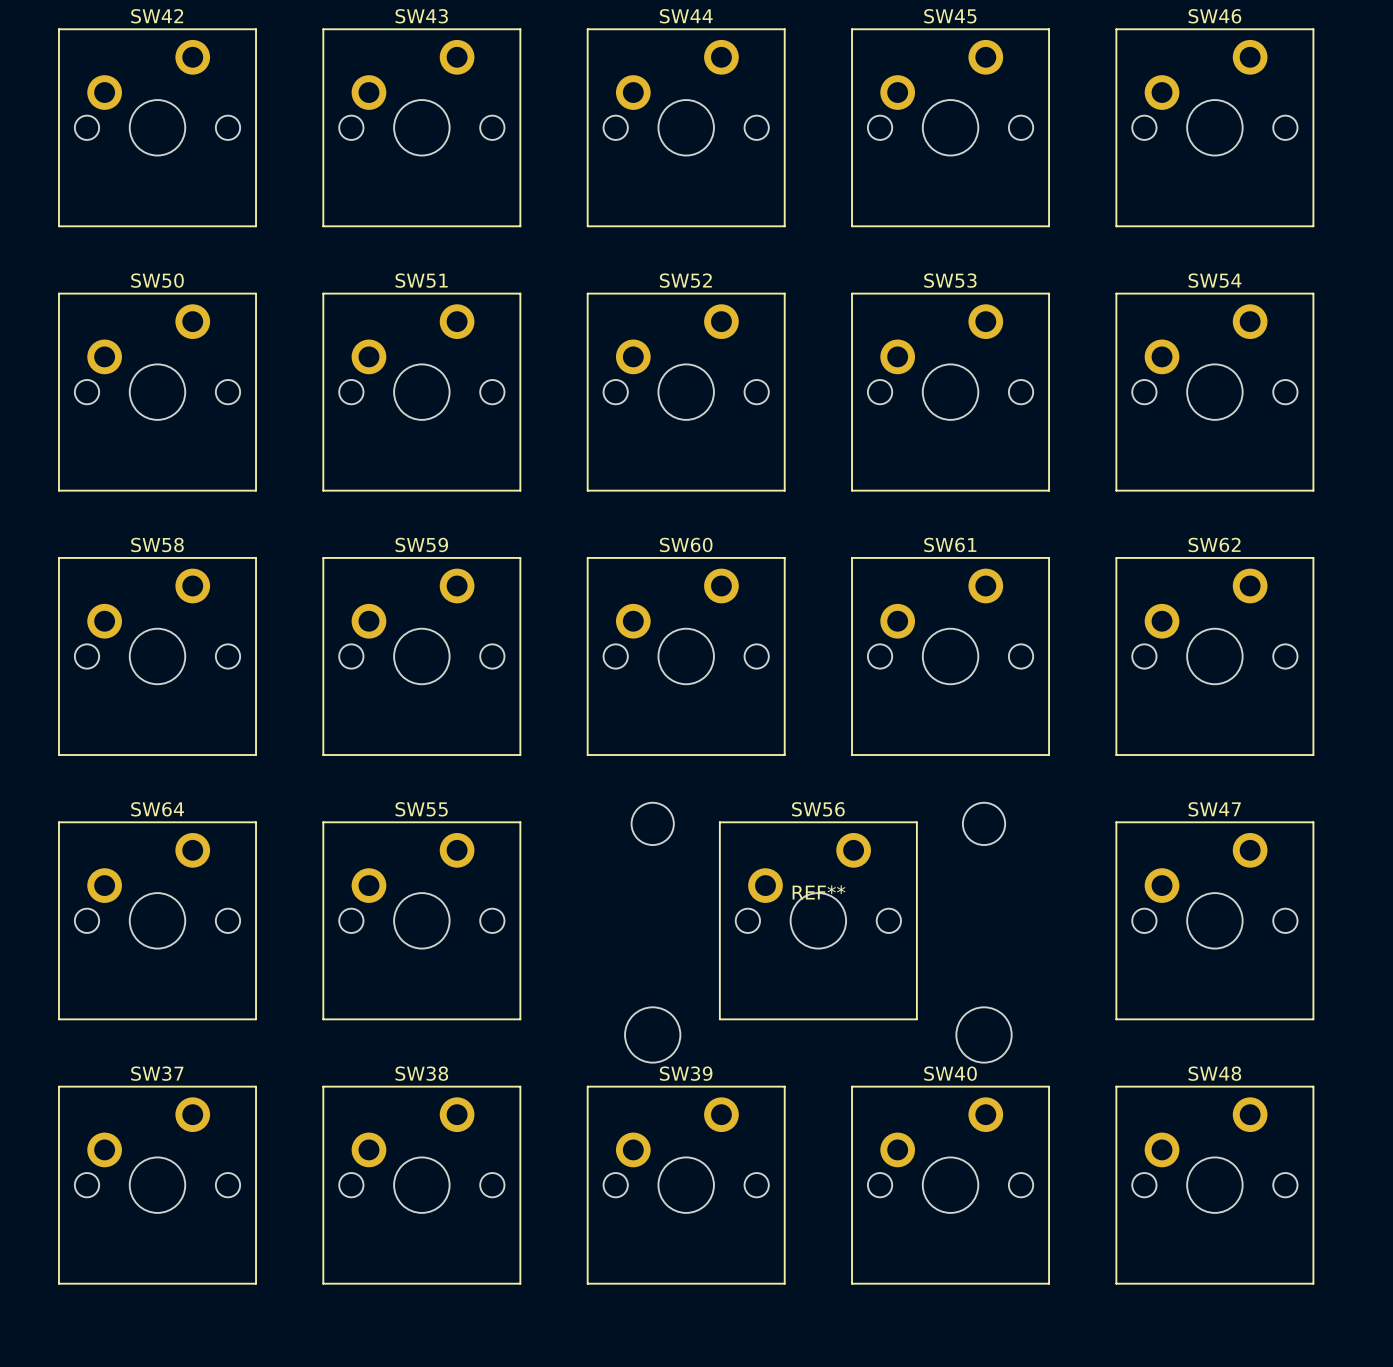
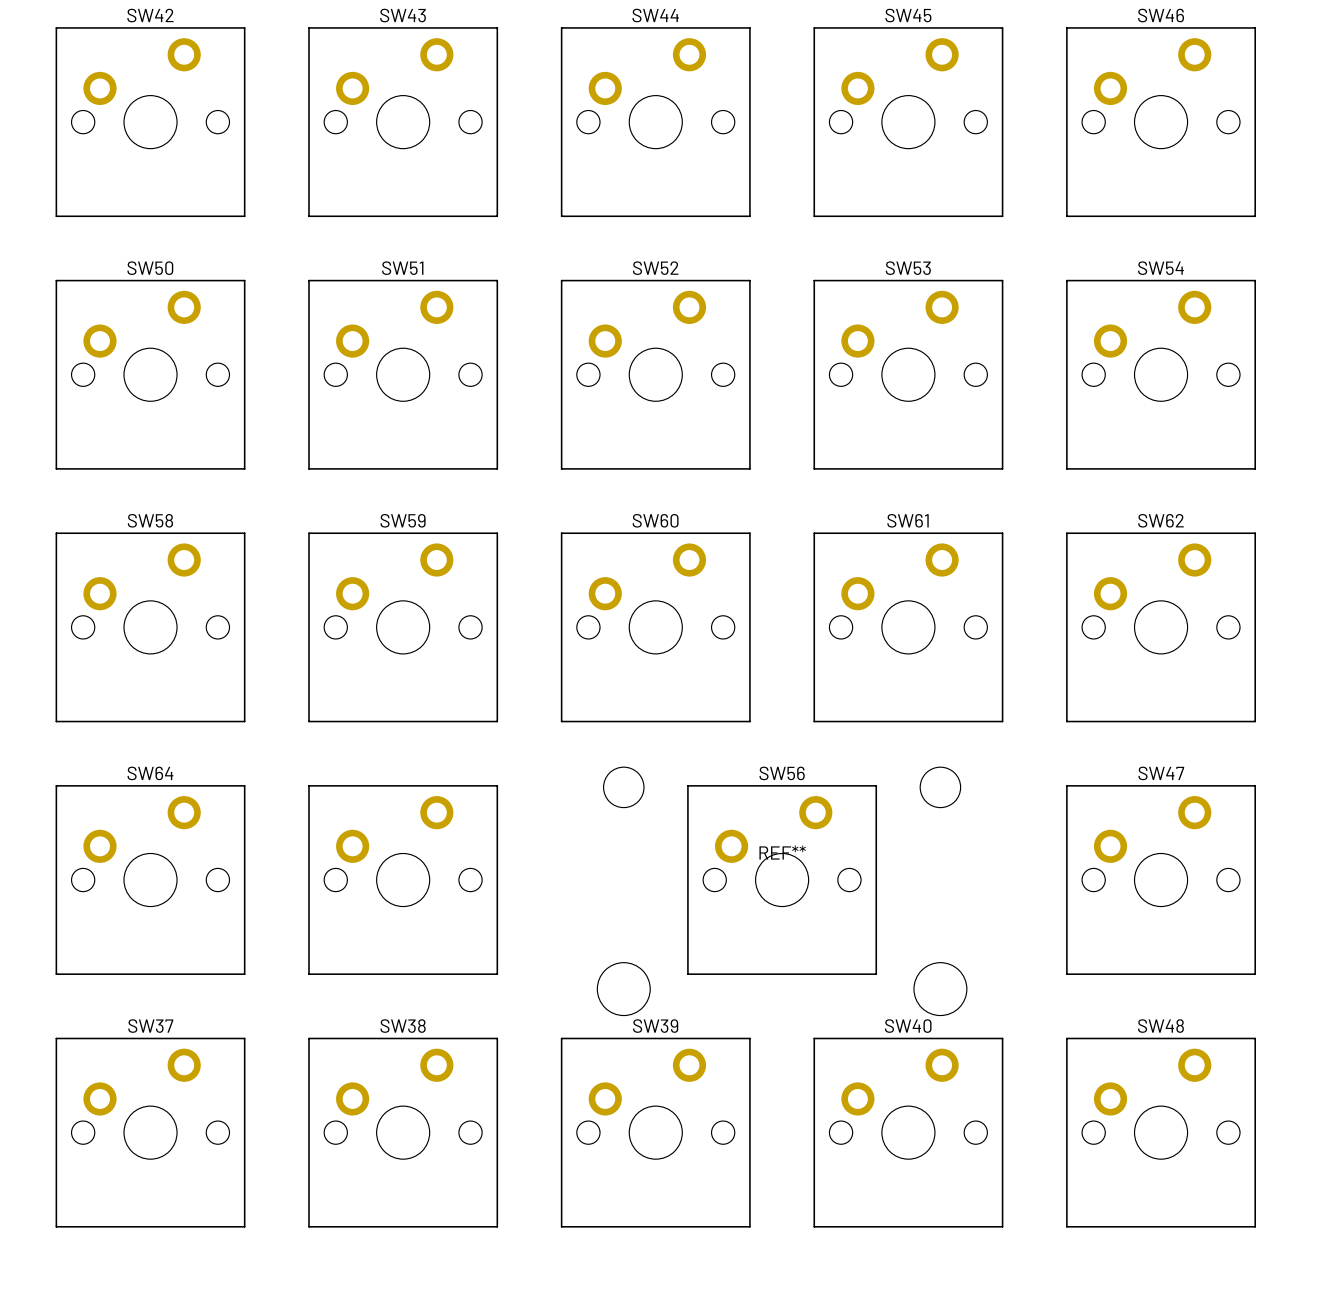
SW55 name: SW55 (421, 809) -> none

